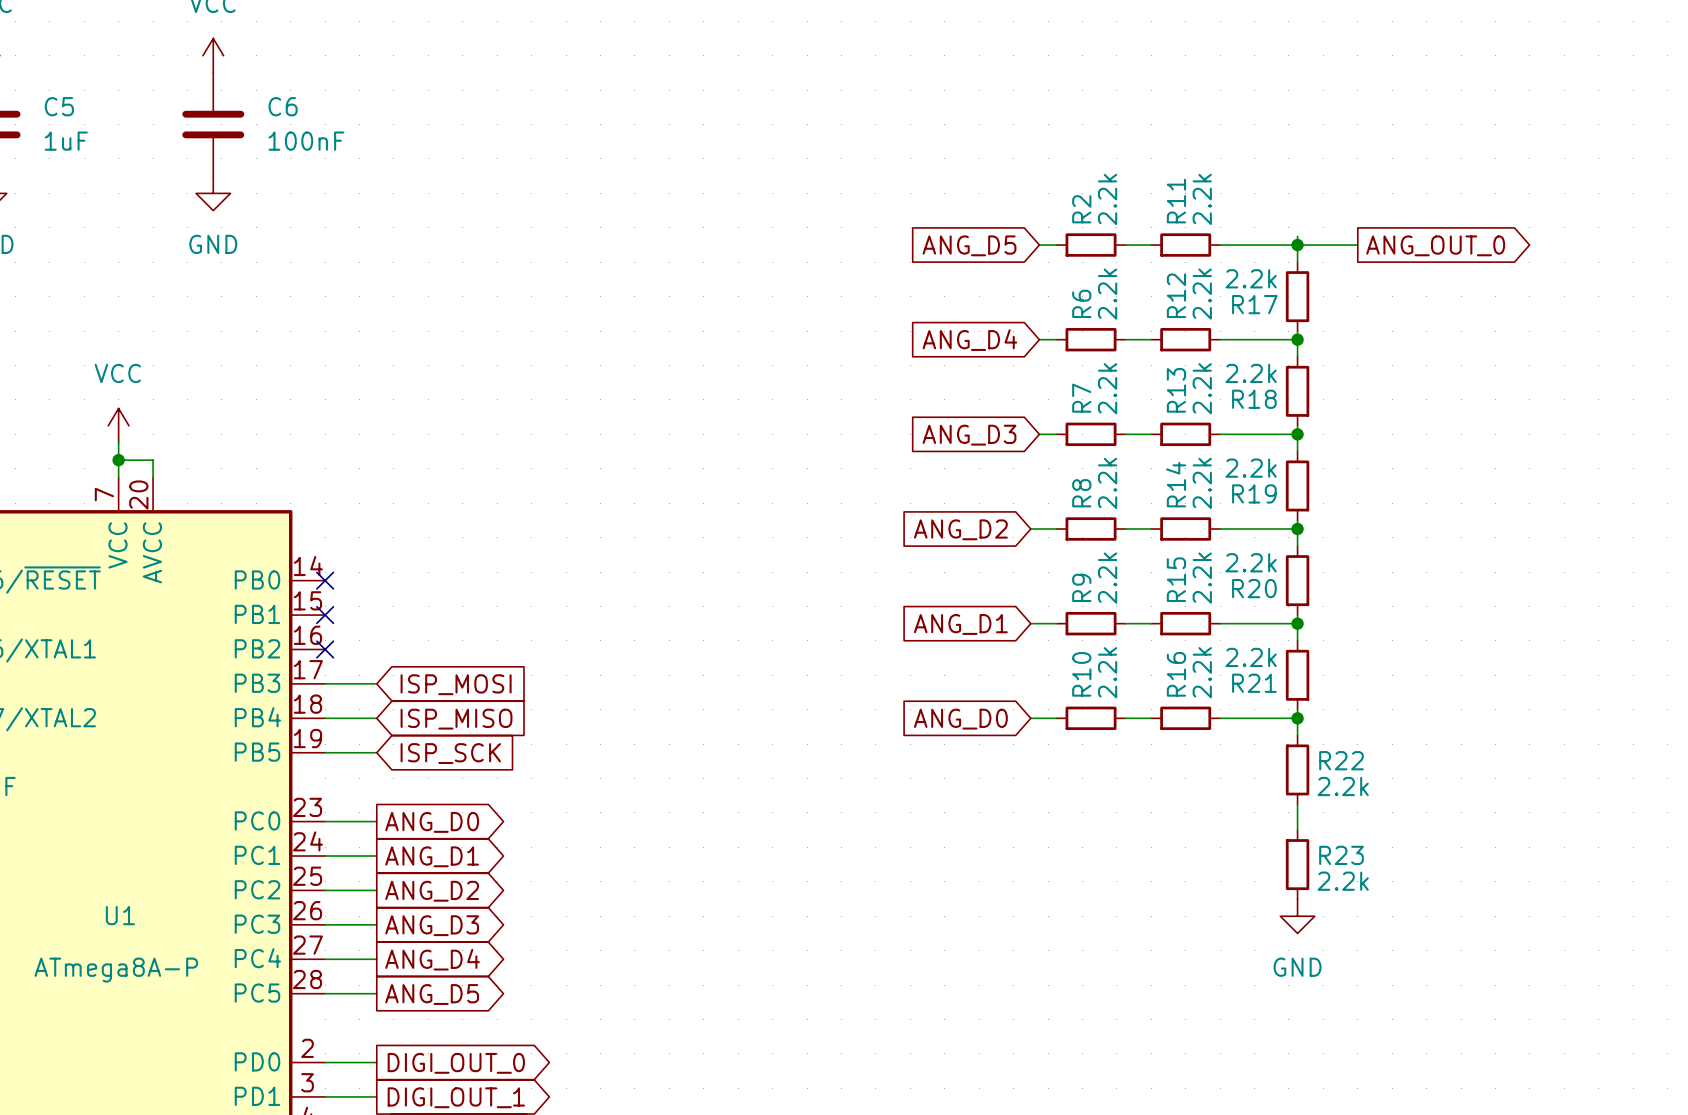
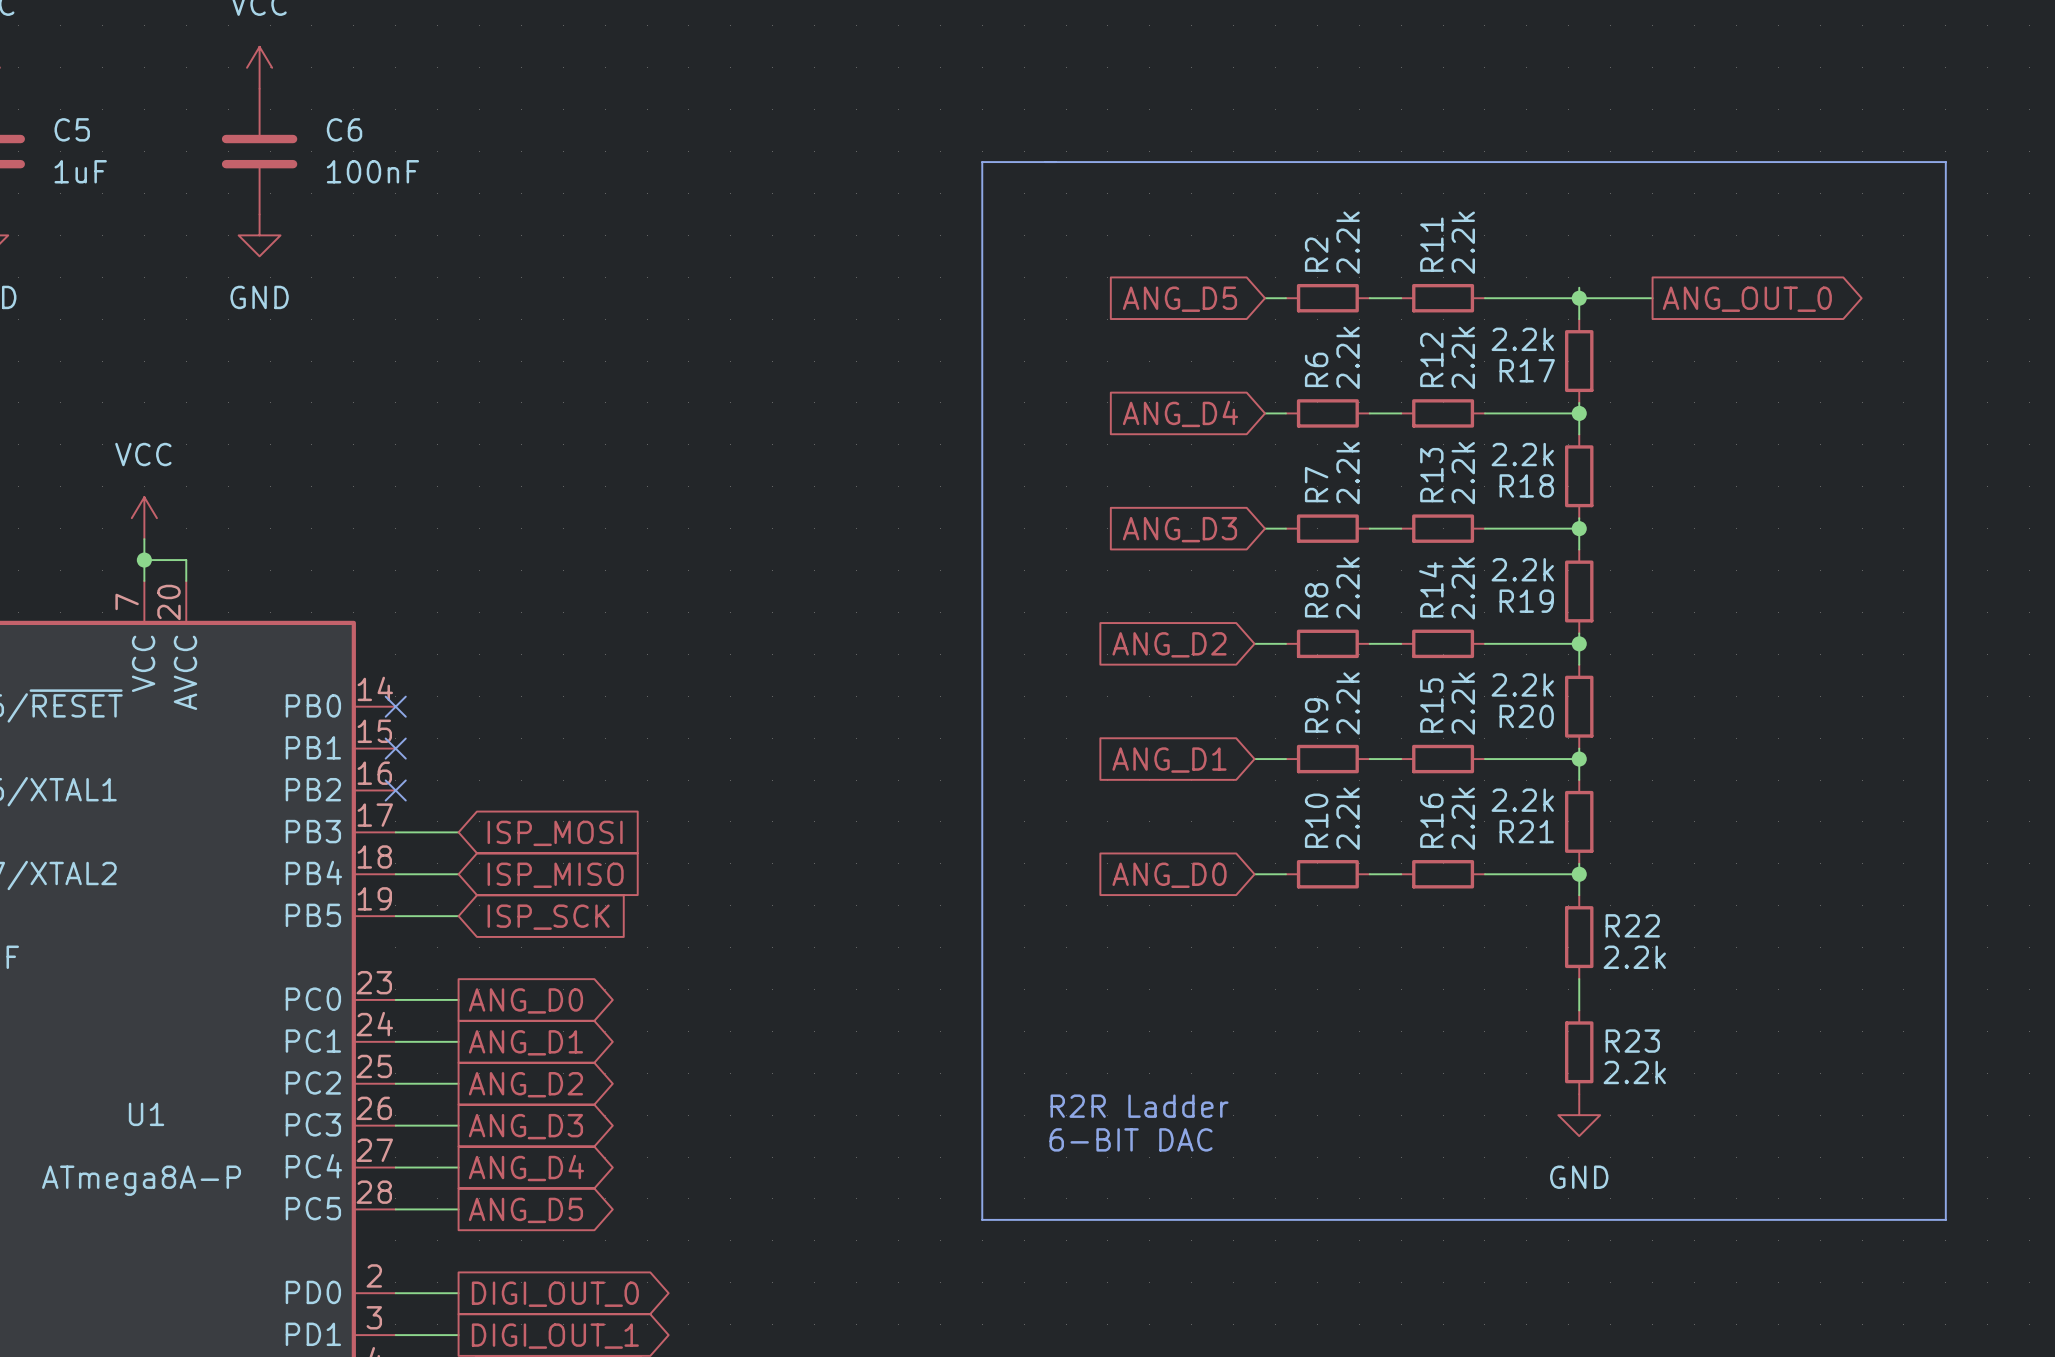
line: none -> (982, 162) (1945, 162) (1945, 1219) (982, 1219) (982, 162)
text: none -> R2R Ladder (1139, 1106)
text: none -> 6-BIT DAC (1131, 1139)

